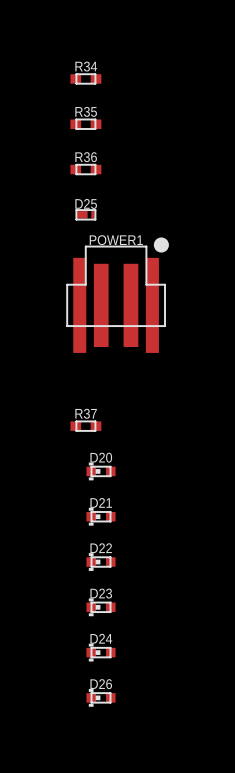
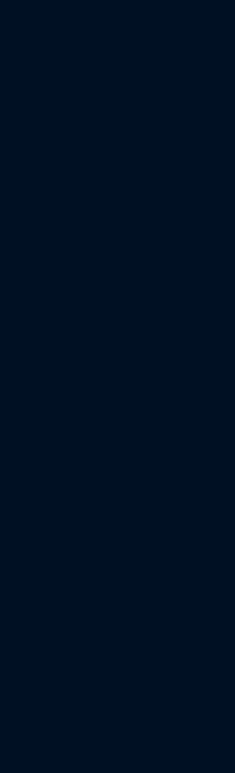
R34: (85, 78) -> none
R35: (85, 124) -> none
R36: (85, 169) -> none
D25: (85, 214) -> none
POWER1: (117, 295) -> none
R37: (85, 426) -> none
D20: (101, 471) -> none
D21: (101, 516) -> none
D22: (101, 562) -> none
D23: (101, 607) -> none
D24: (101, 652) -> none
D26: (101, 697) -> none

